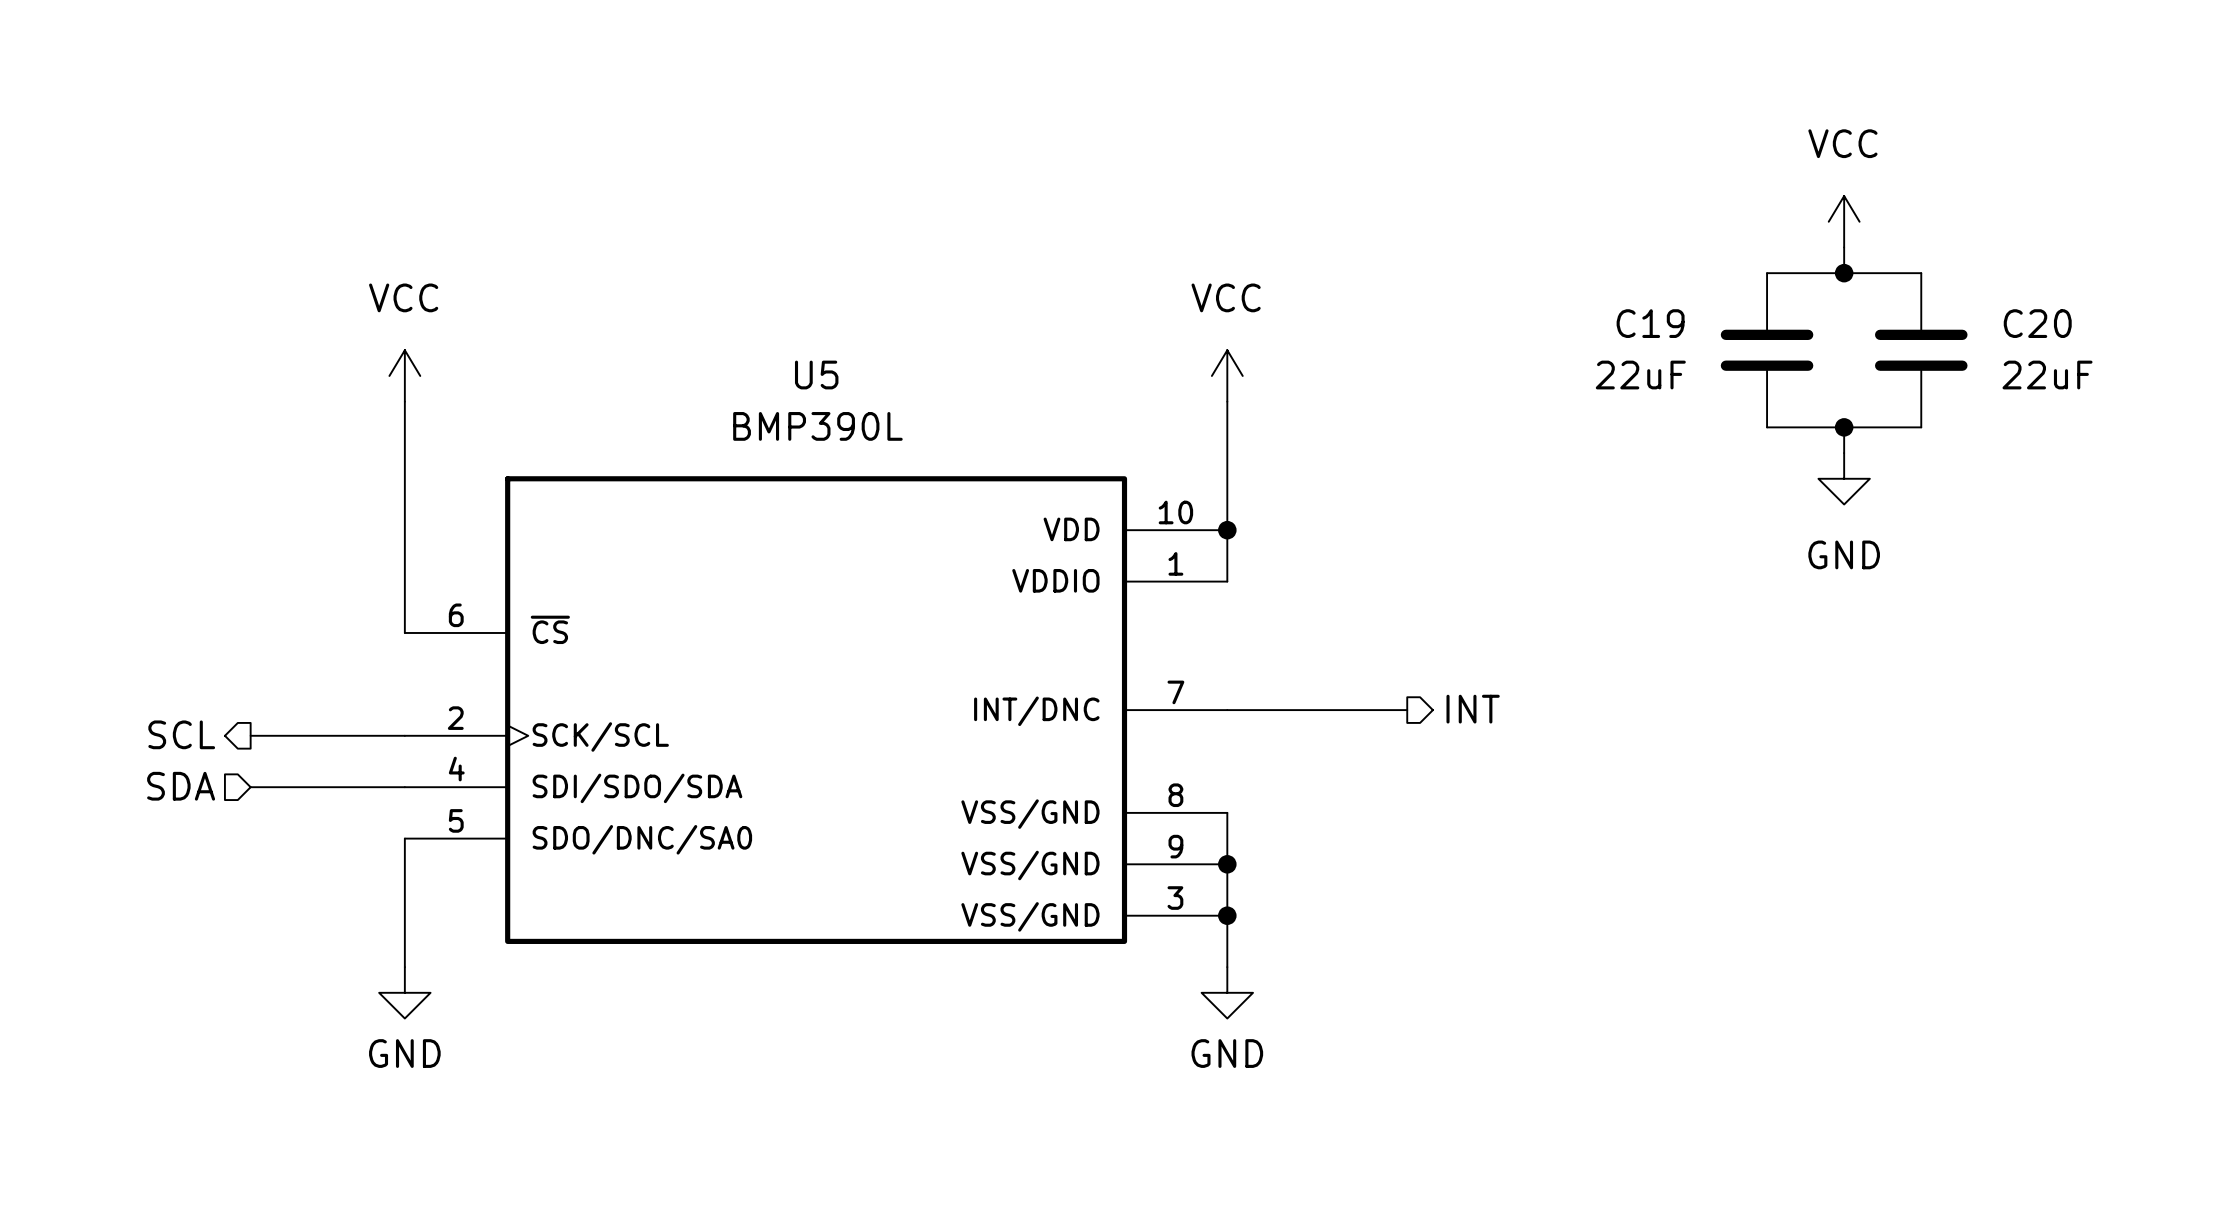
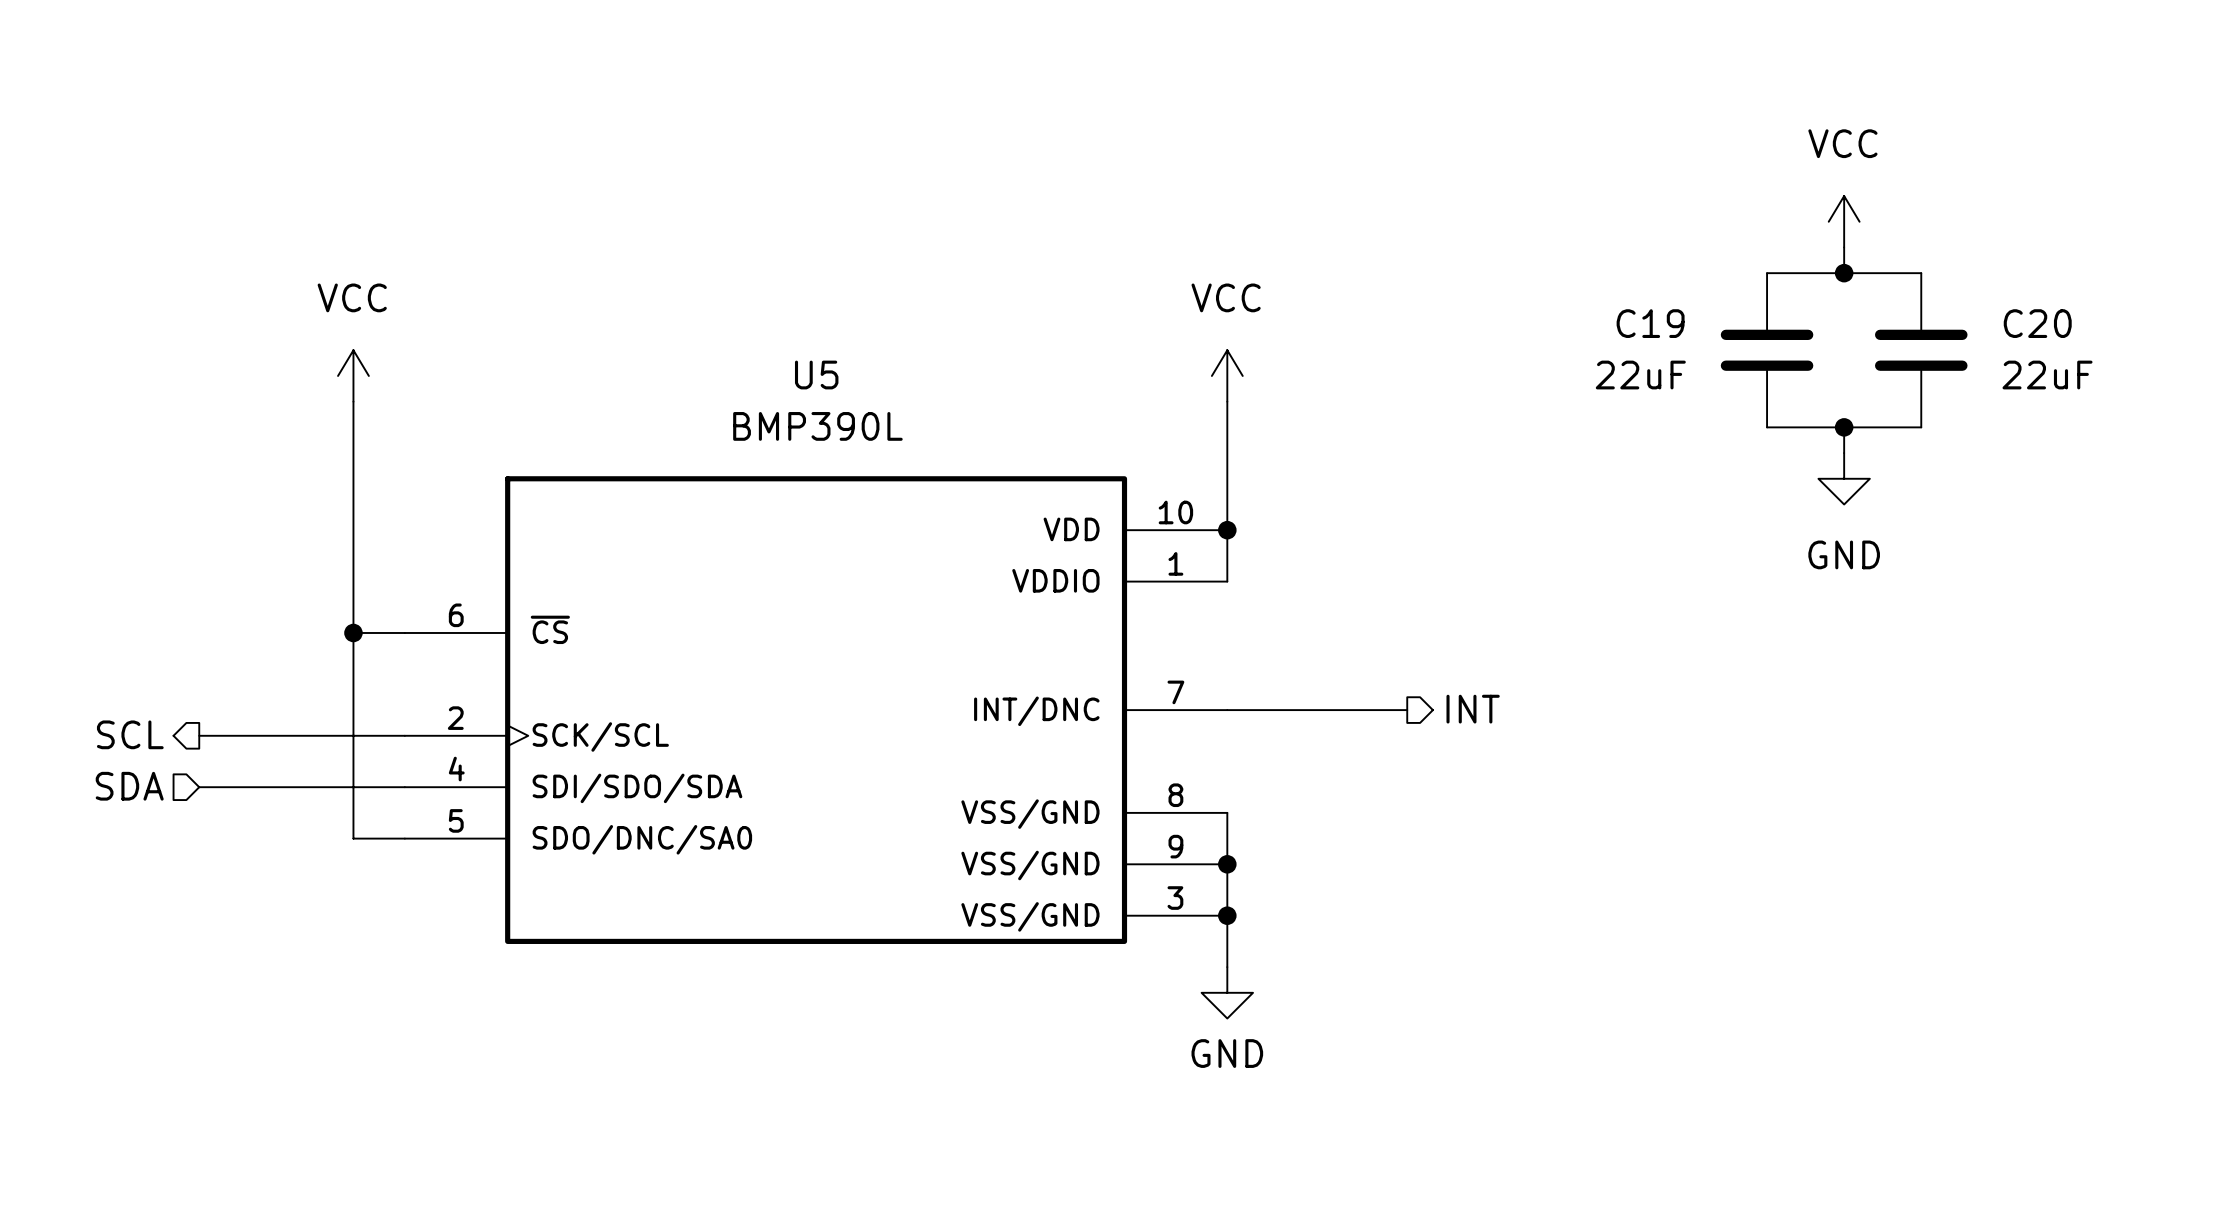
power symbol position: VCC (404, 375) -> VCC (353, 375)
wire: (404, 401) (404, 632) -> (353, 632) (404, 632)
junction: none -> (353, 632)
hierarchical label position: SCL (181, 734) -> SCL (130, 734)
wire: none -> (199, 735) (250, 735)
hierarchical label position: SDA (181, 786) -> SDA (129, 786)
wire: none -> (199, 787) (250, 787)
wire: (404, 838) (404, 967) -> (404, 838) (353, 838) (353, 401)
power symbol: GND (404, 992) -> none

